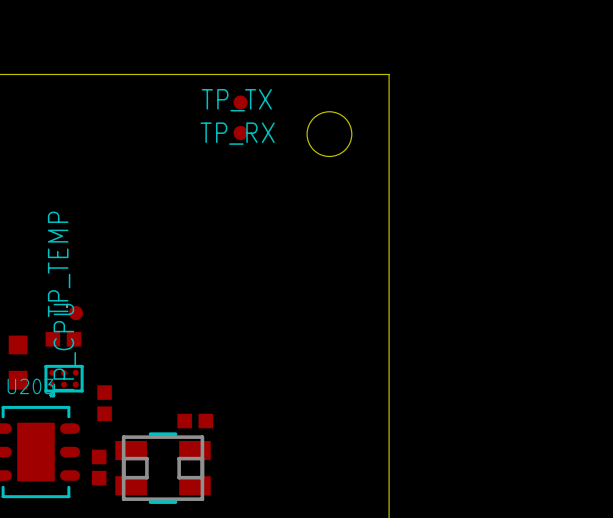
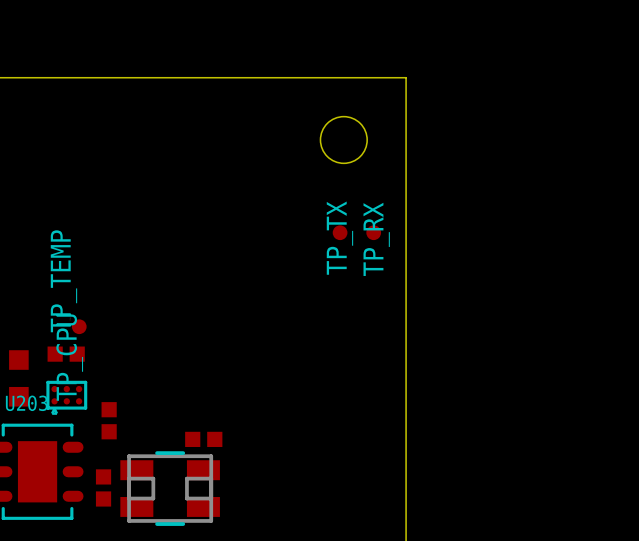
TP_TX name rotation: 0° (236, 100) -> 90° counterclockwise (339, 238)
TP_TX position: (240, 102) -> (340, 232)
TP_RX position: (240, 132) -> (373, 232)
TP_RX name rotation: 0° (237, 133) -> 90° counterclockwise (376, 239)

